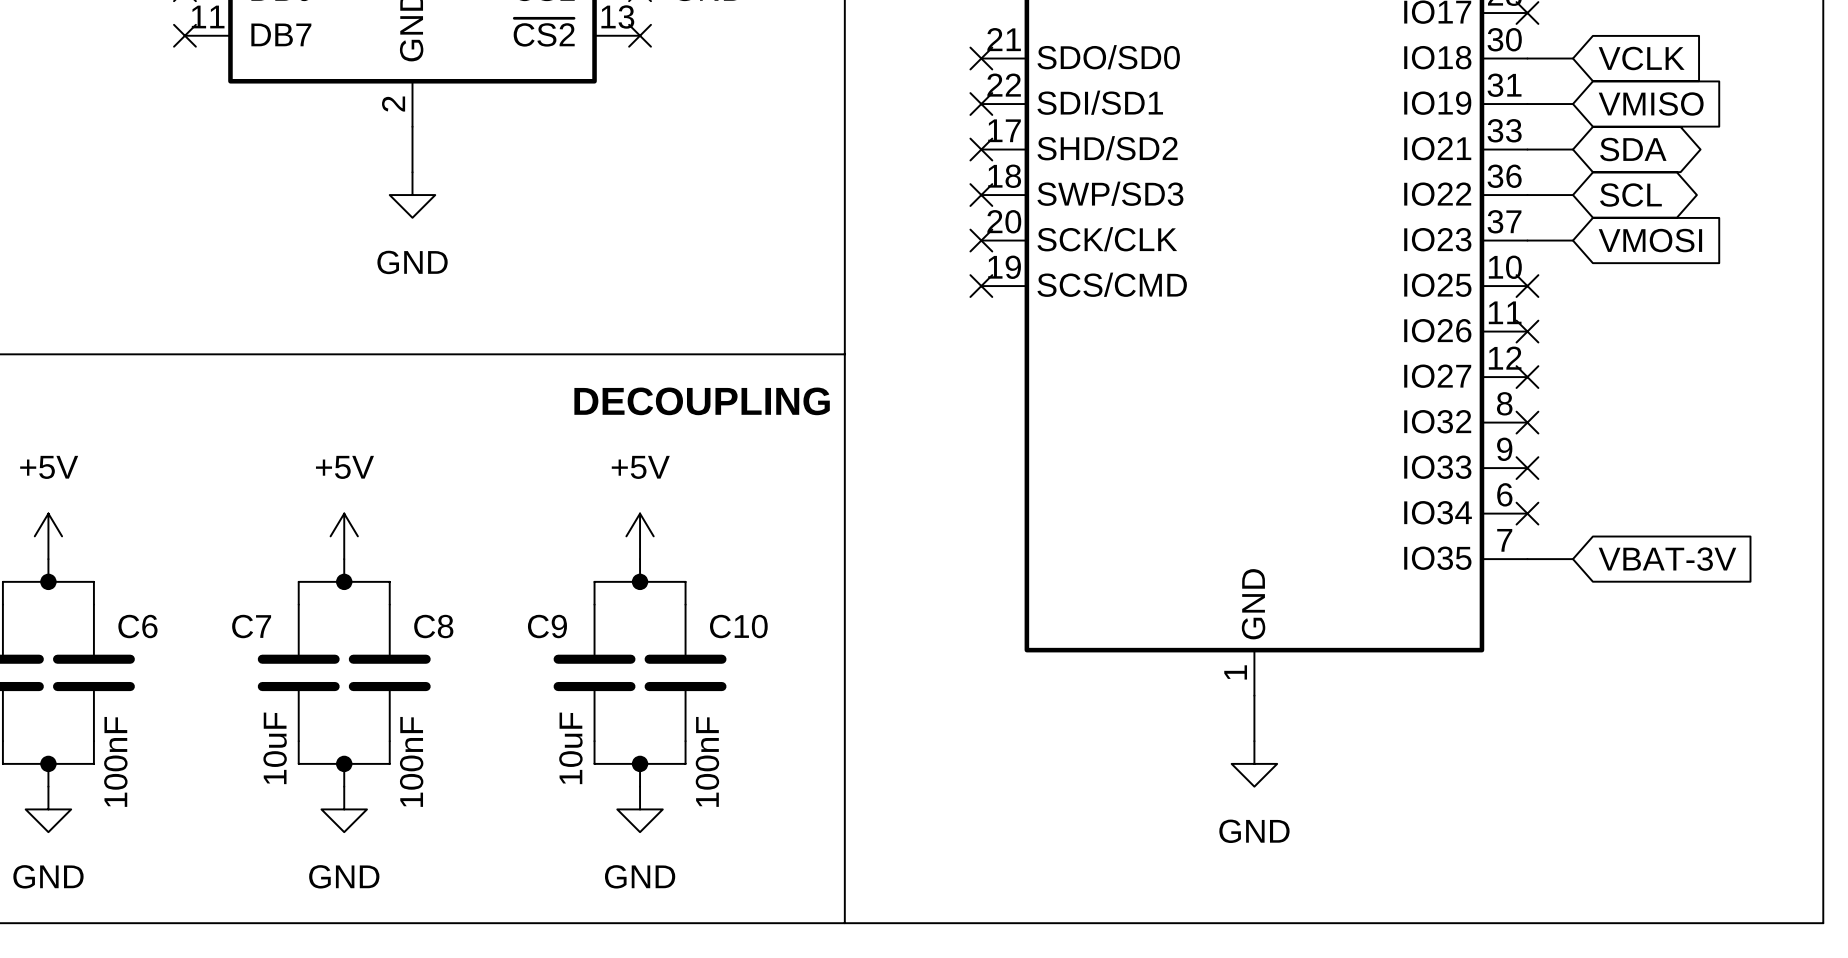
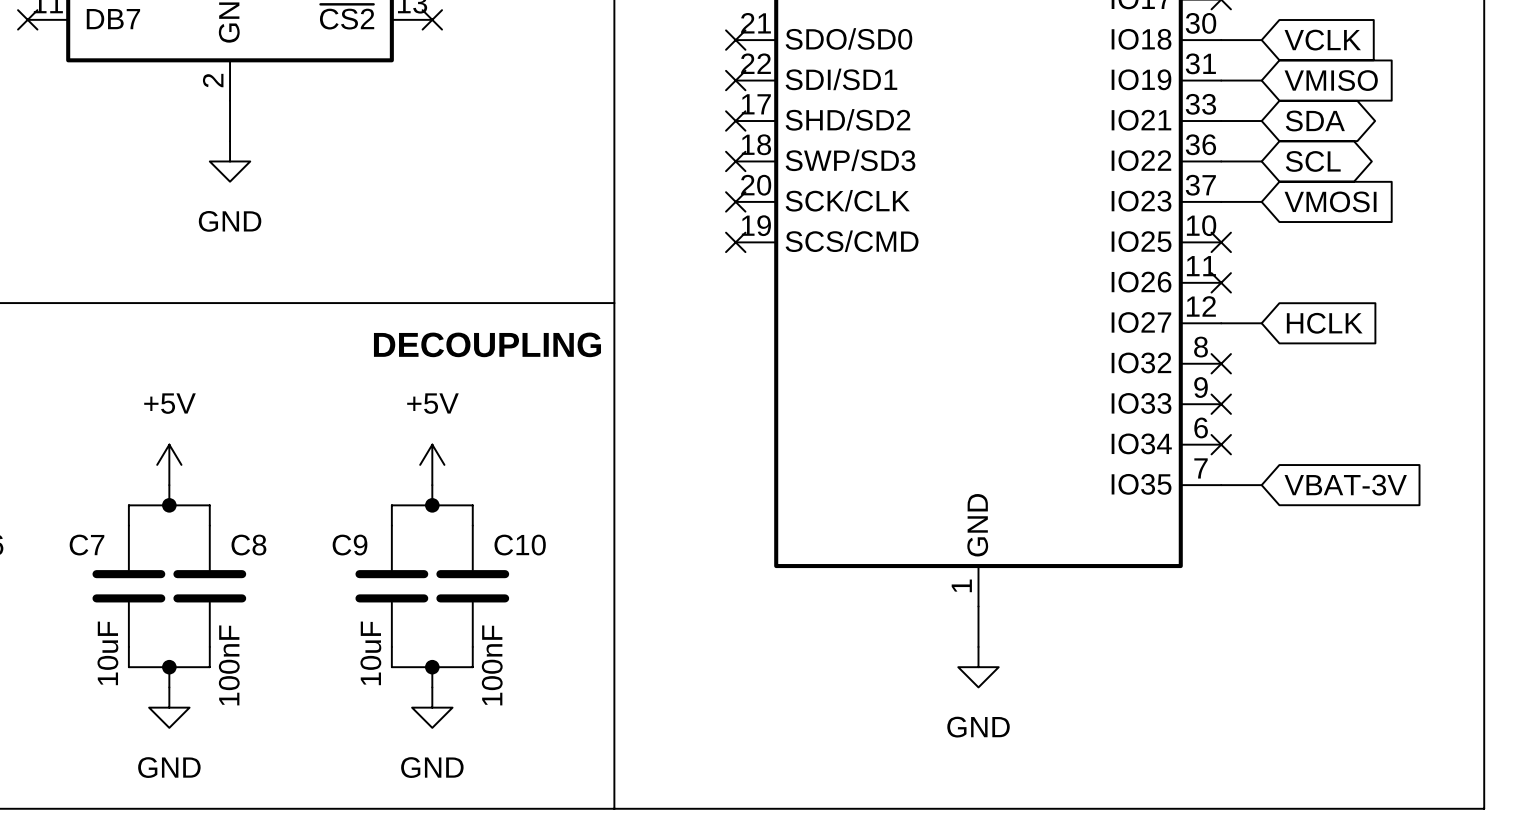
wire: none -> (1221, 323) (1261, 323)
no-connect mark: (1527, 377) -> none
global label: none -> HCLK (1324, 323)

